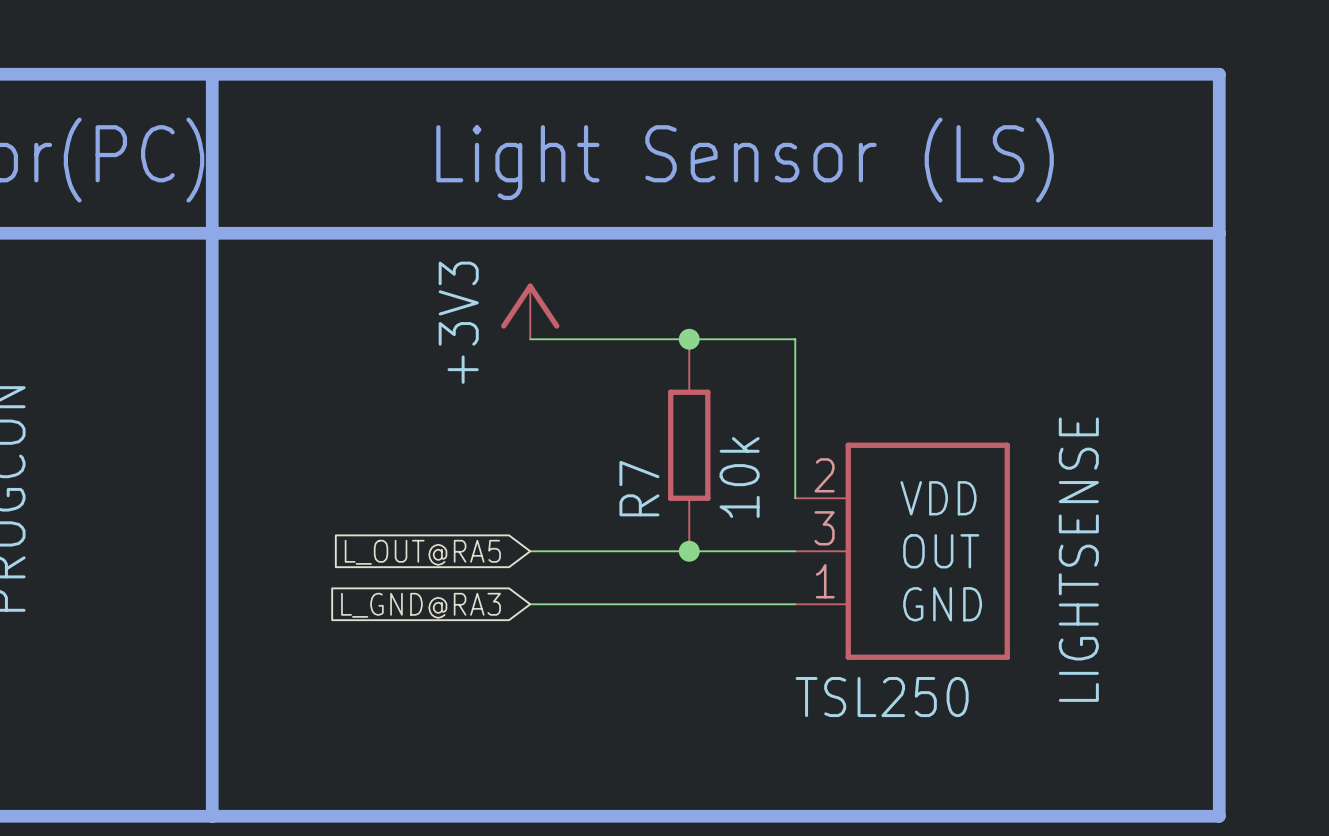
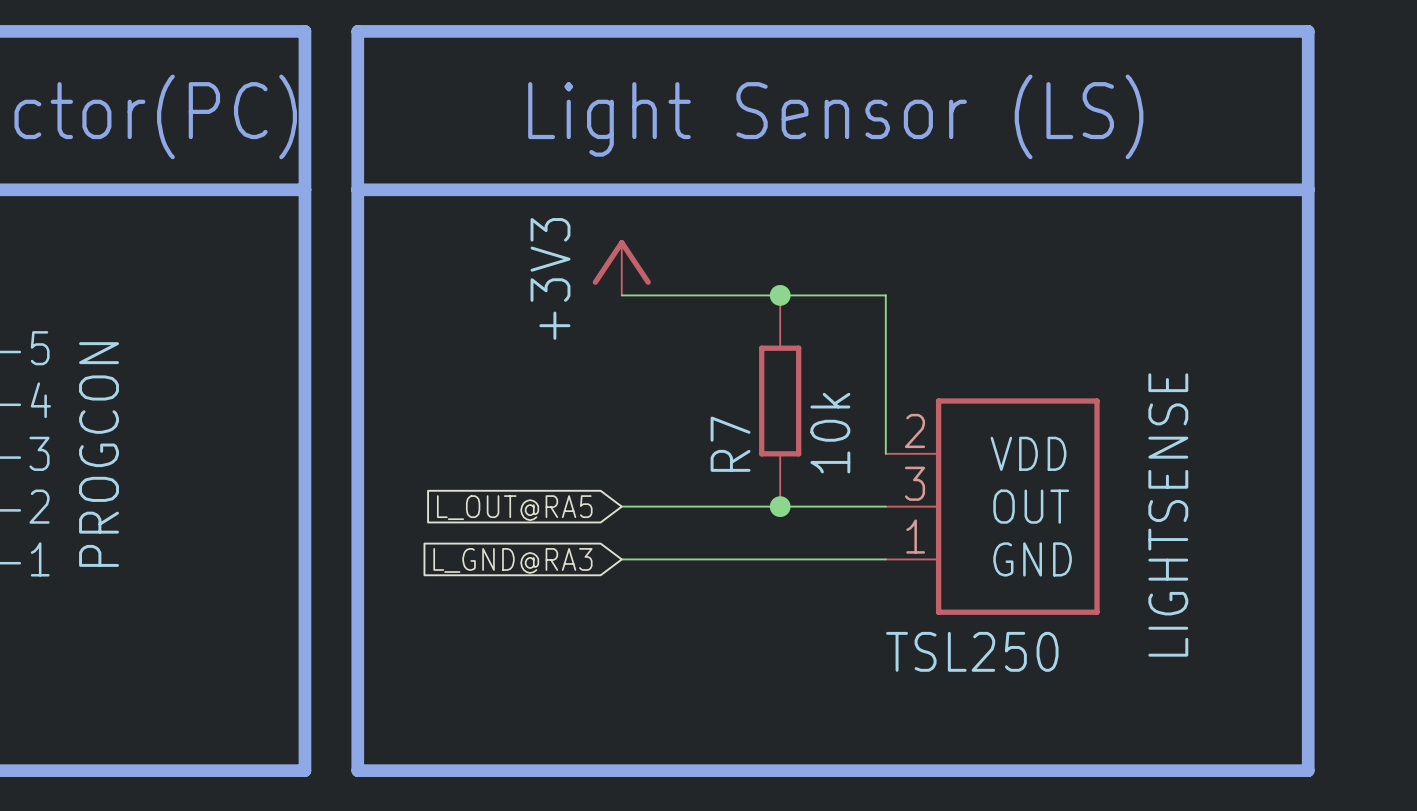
line: (212, 74) (265, 74) -> (357, 770) (357, 31)
line: (212, 233) (265, 233) -> none
line: (212, 816) (265, 816) -> none

